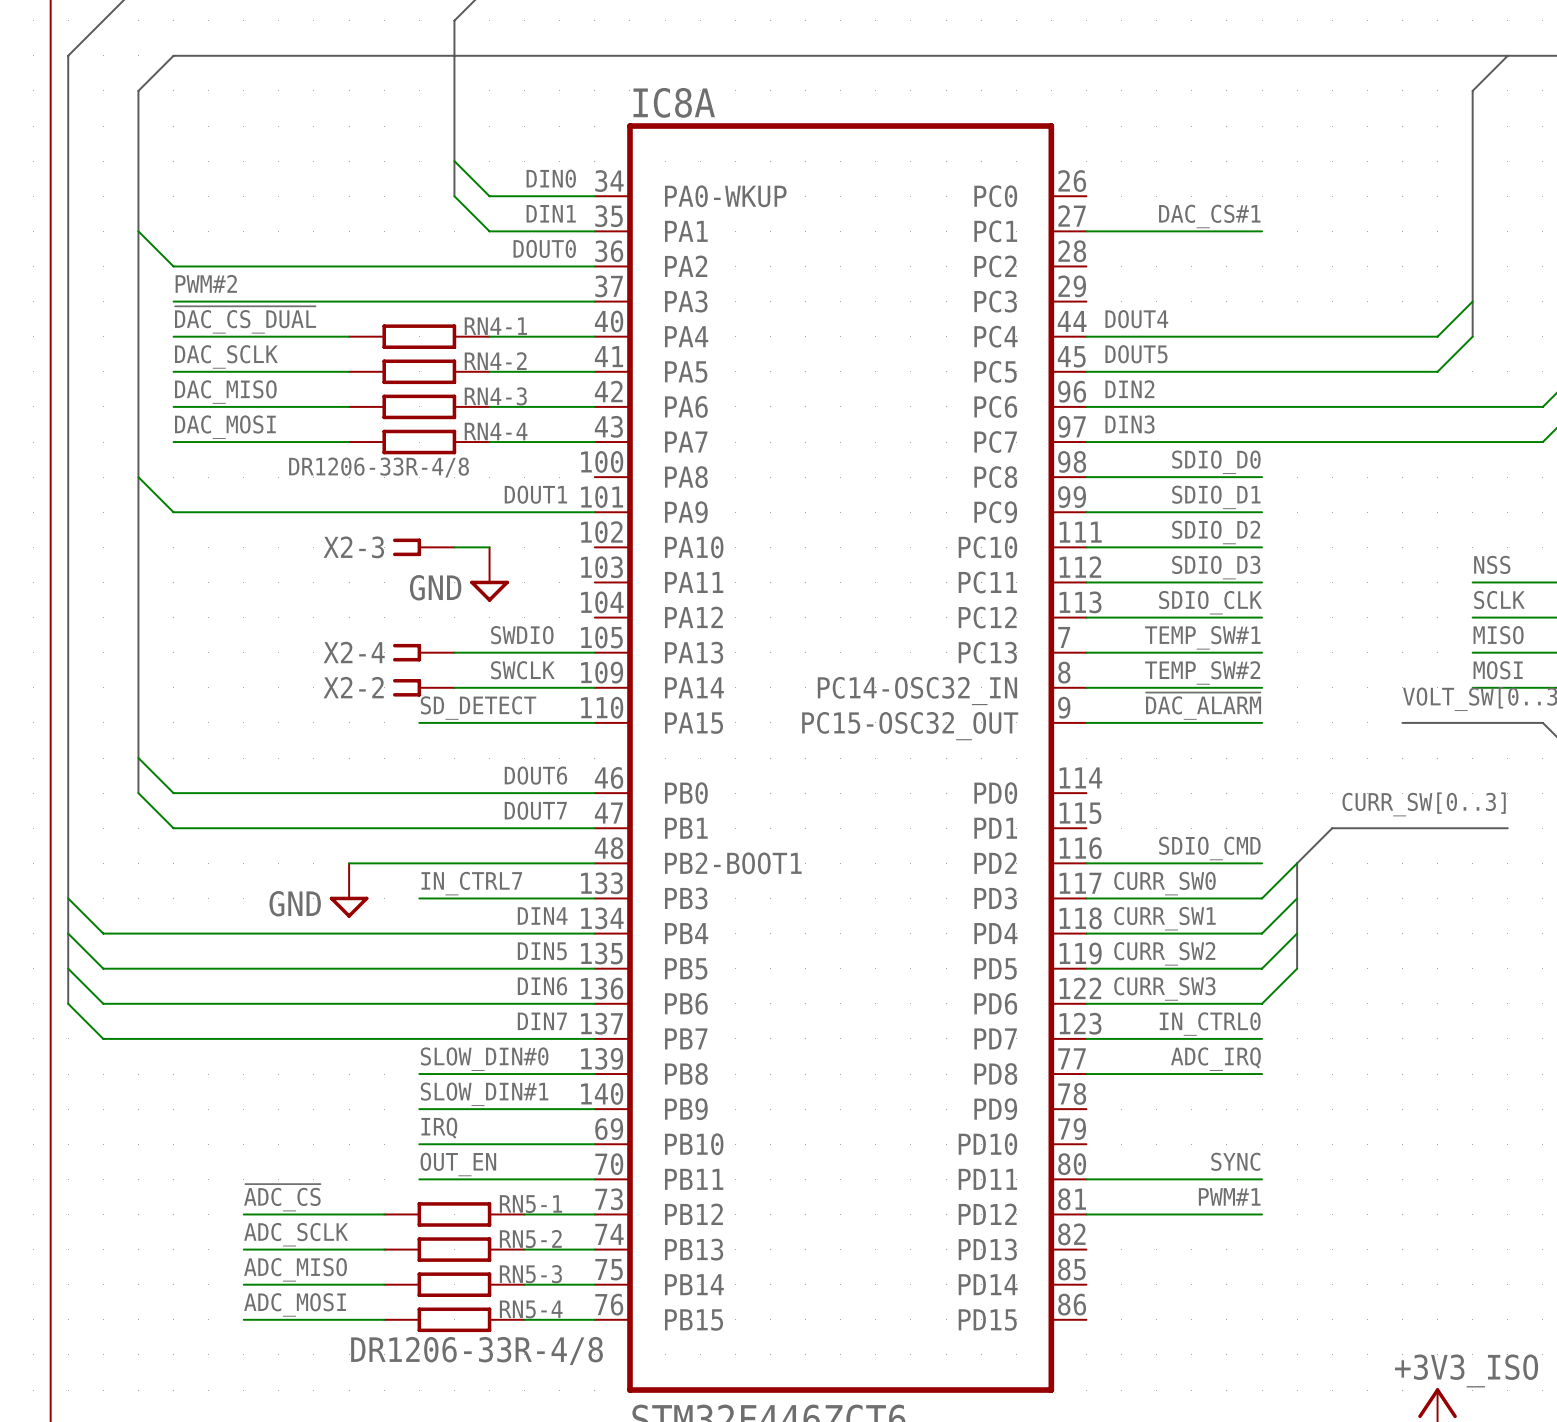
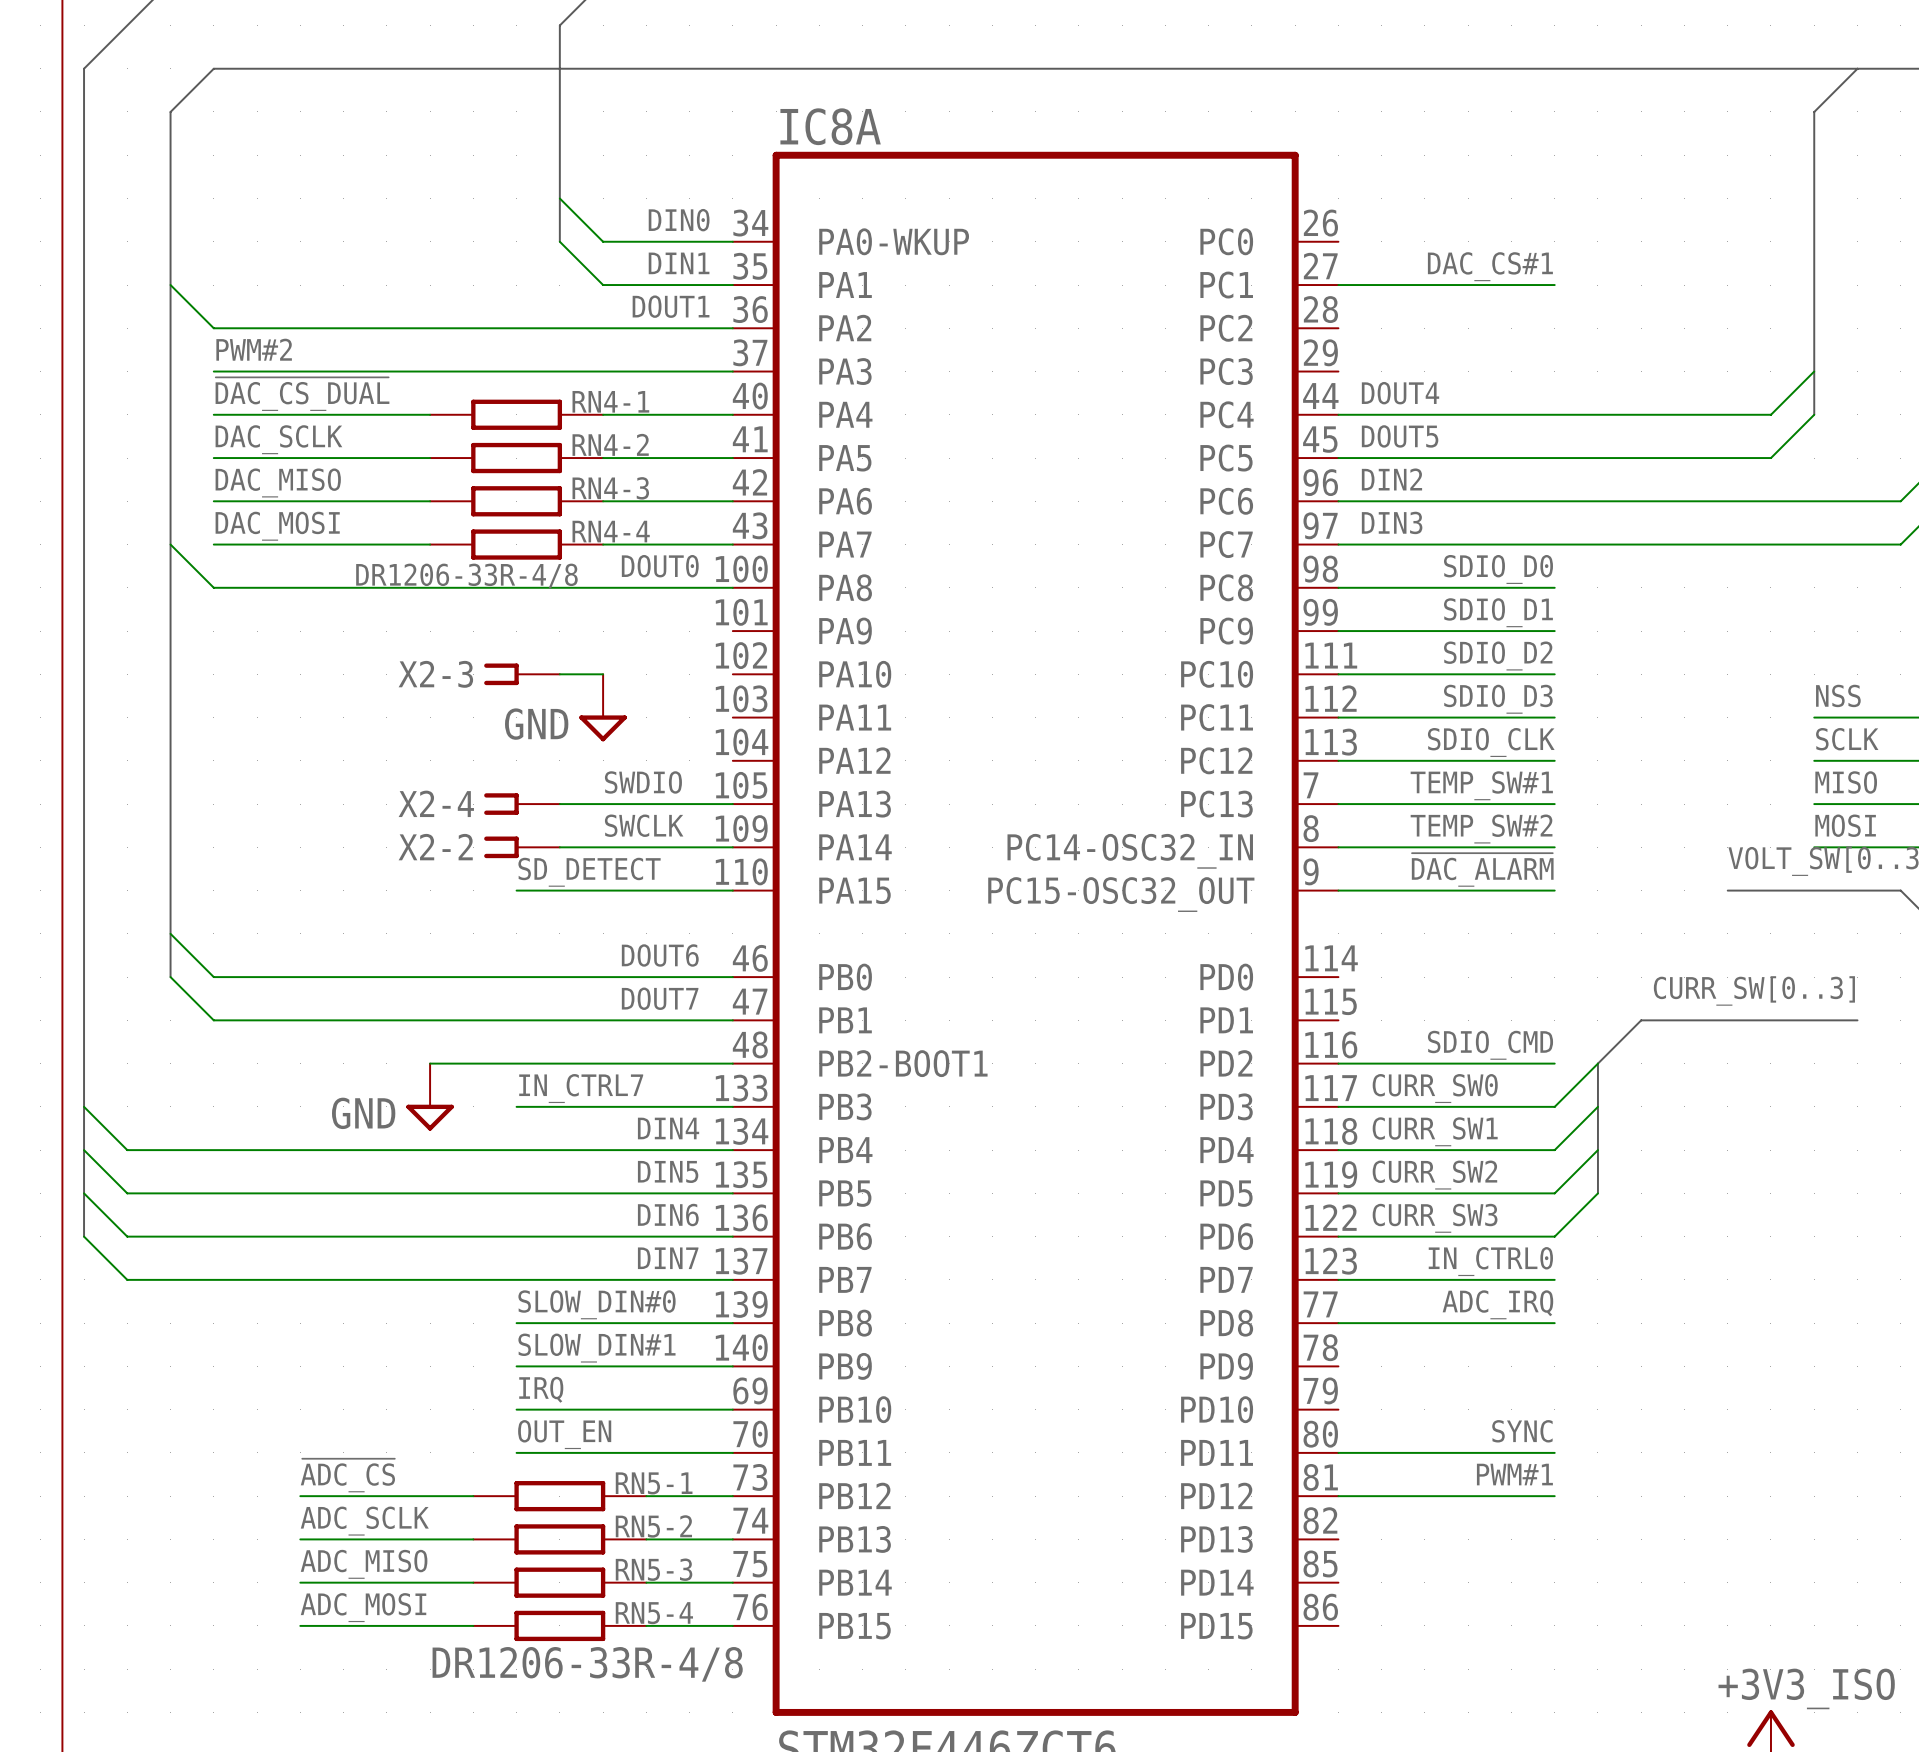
label: DOUT0 (544, 248) -> DOUT1 (671, 306)
wire: (138, 477) (173, 512) (594, 512) -> (170, 544) (213, 587) (732, 587)
label: DOUT1 (535, 494) -> DOUT0 (660, 566)

